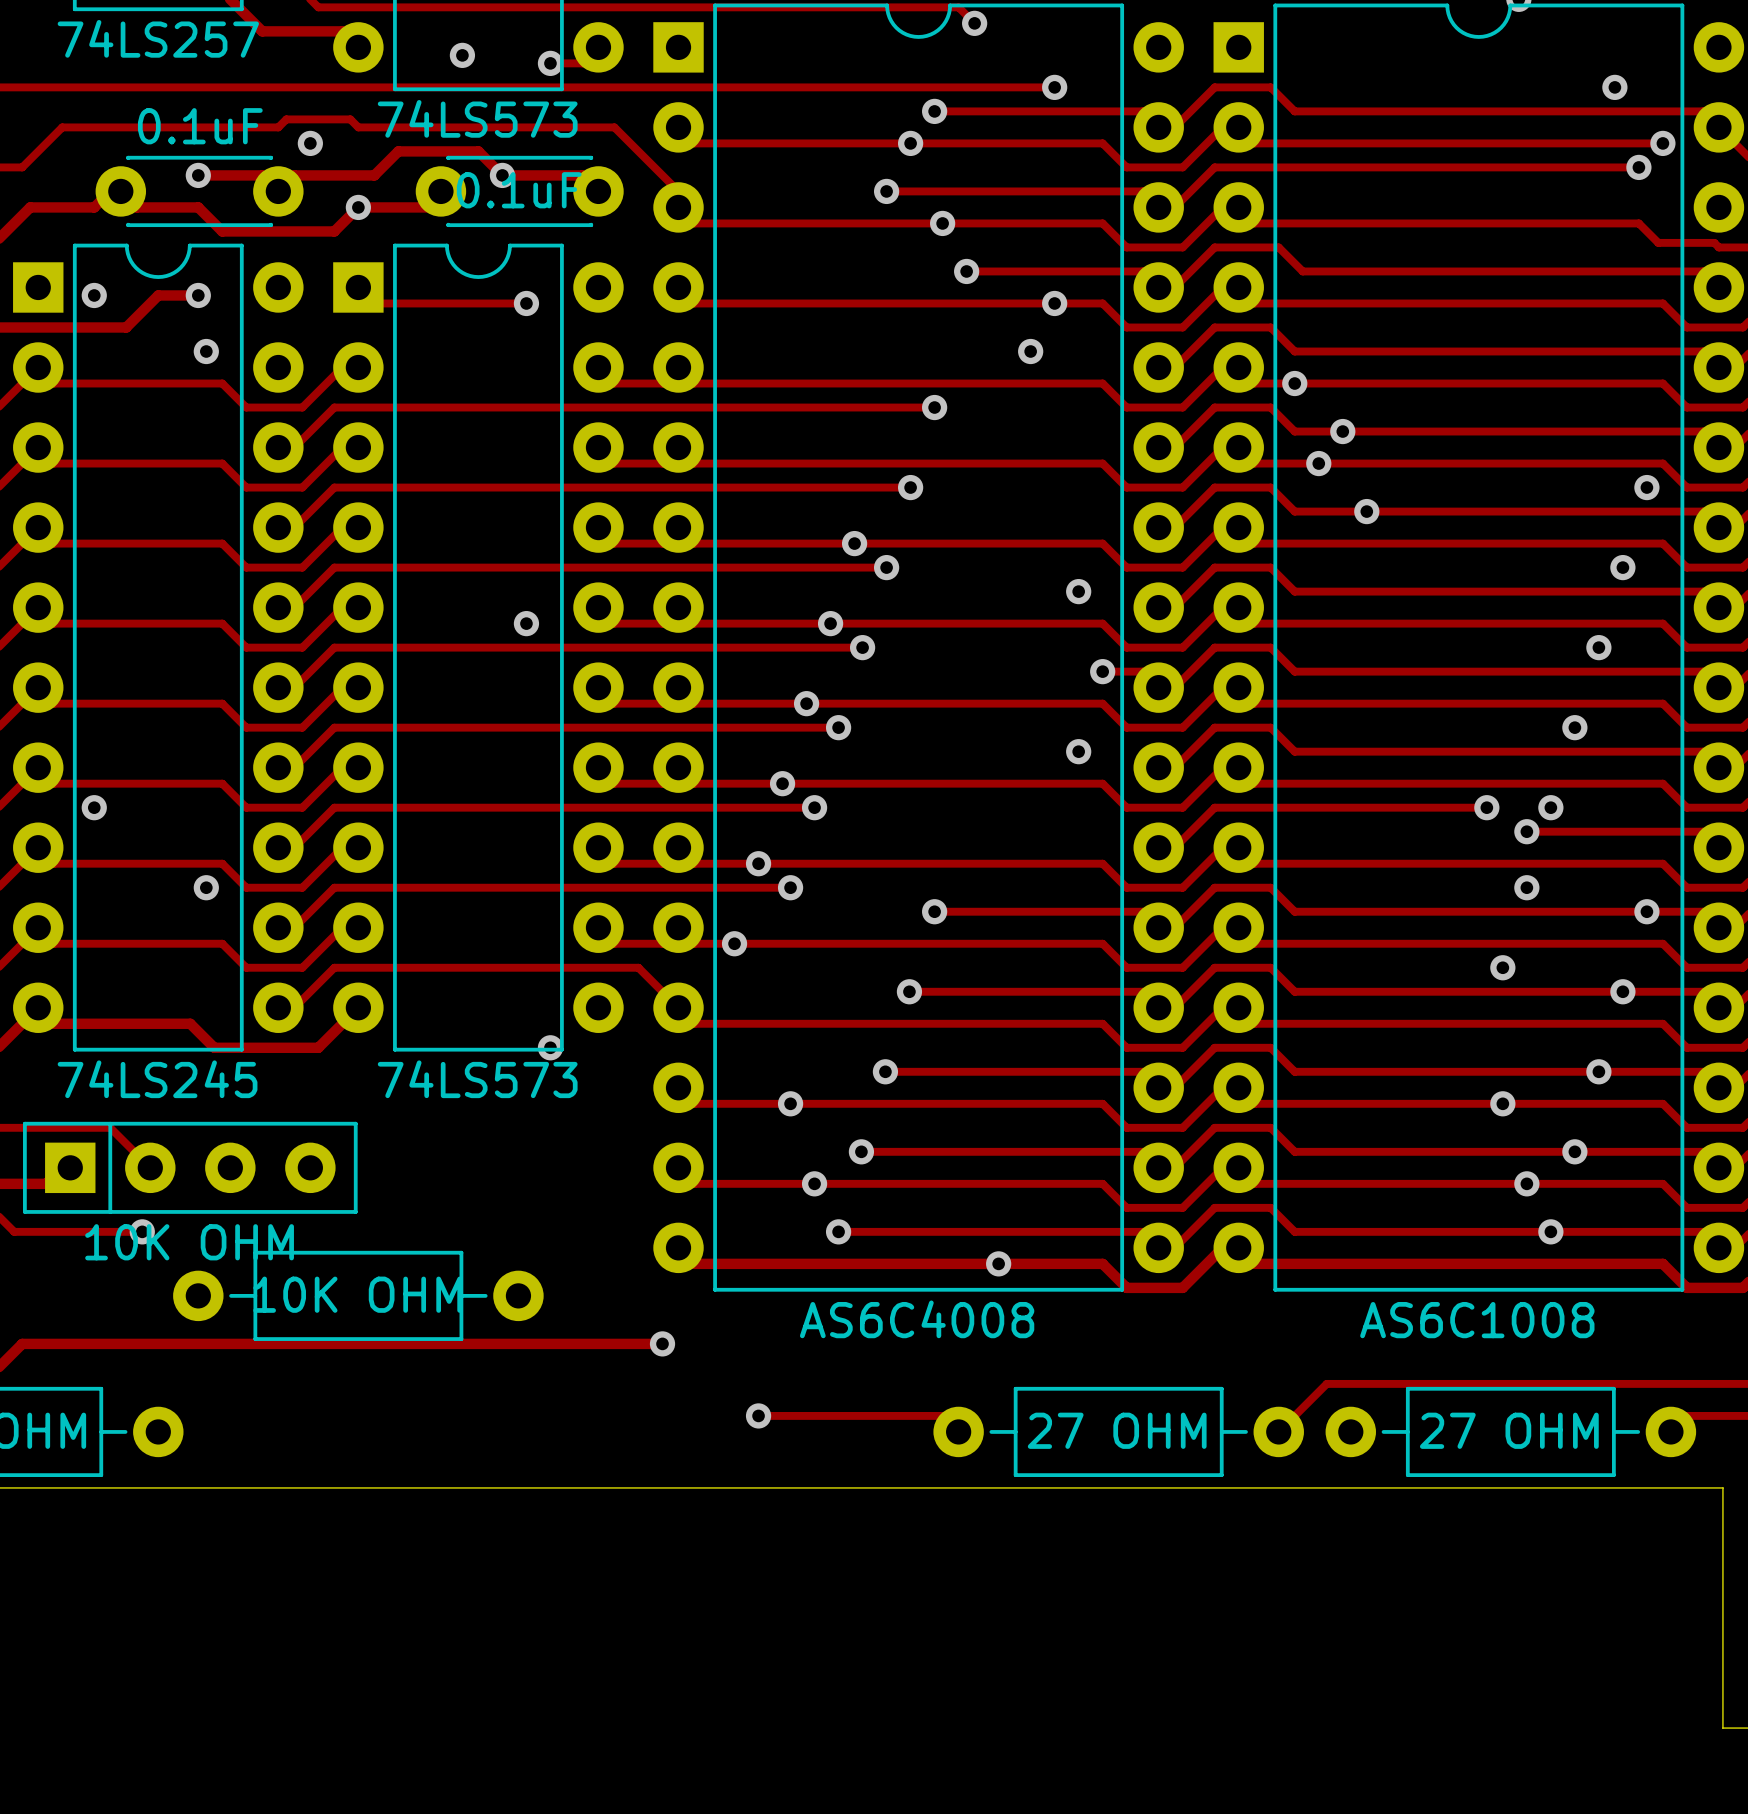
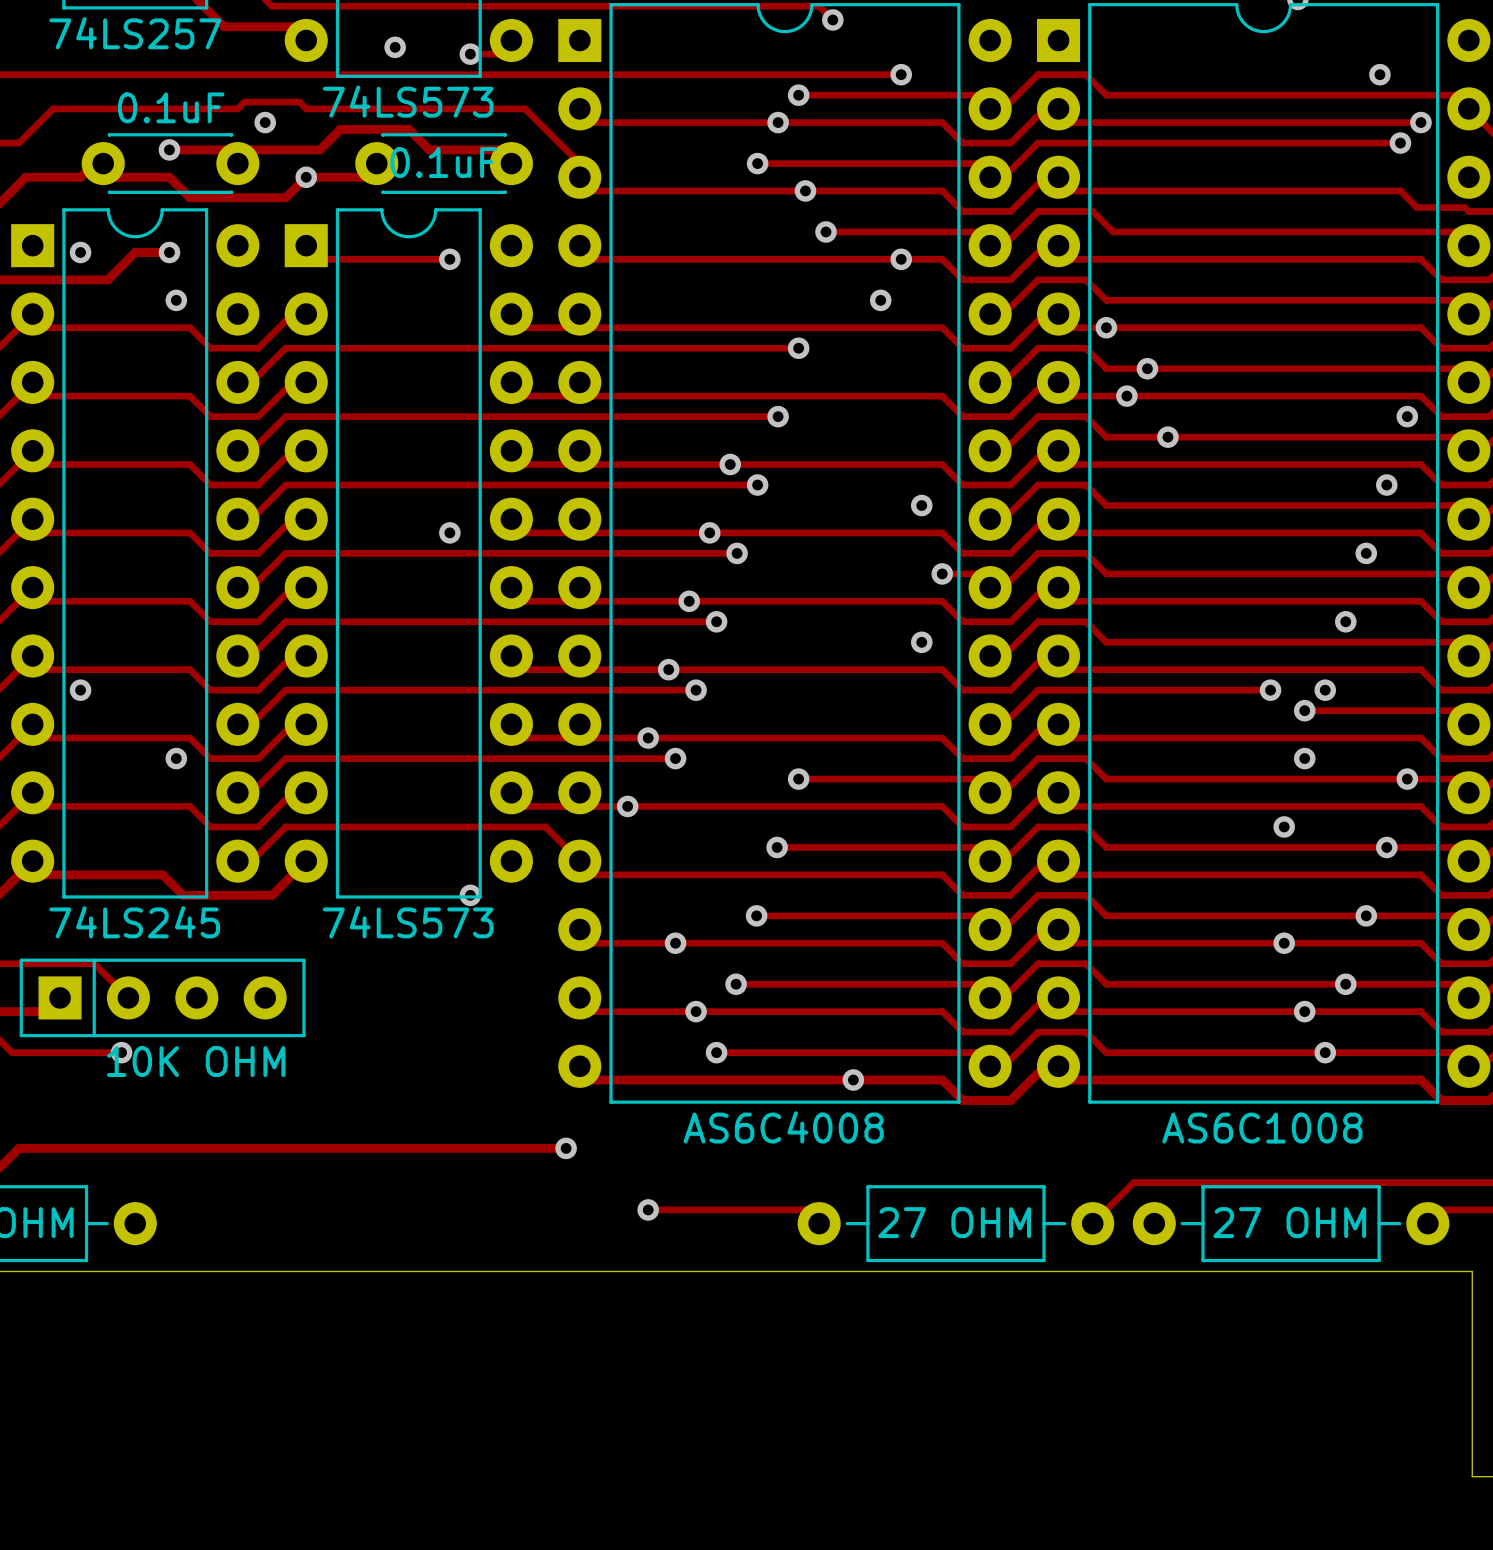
via: (502, 175) -> none
part value position: 10K OHM (189, 1242) -> 10K OHM (196, 1061)
part: 10K OHM (358, 1295) -> none

